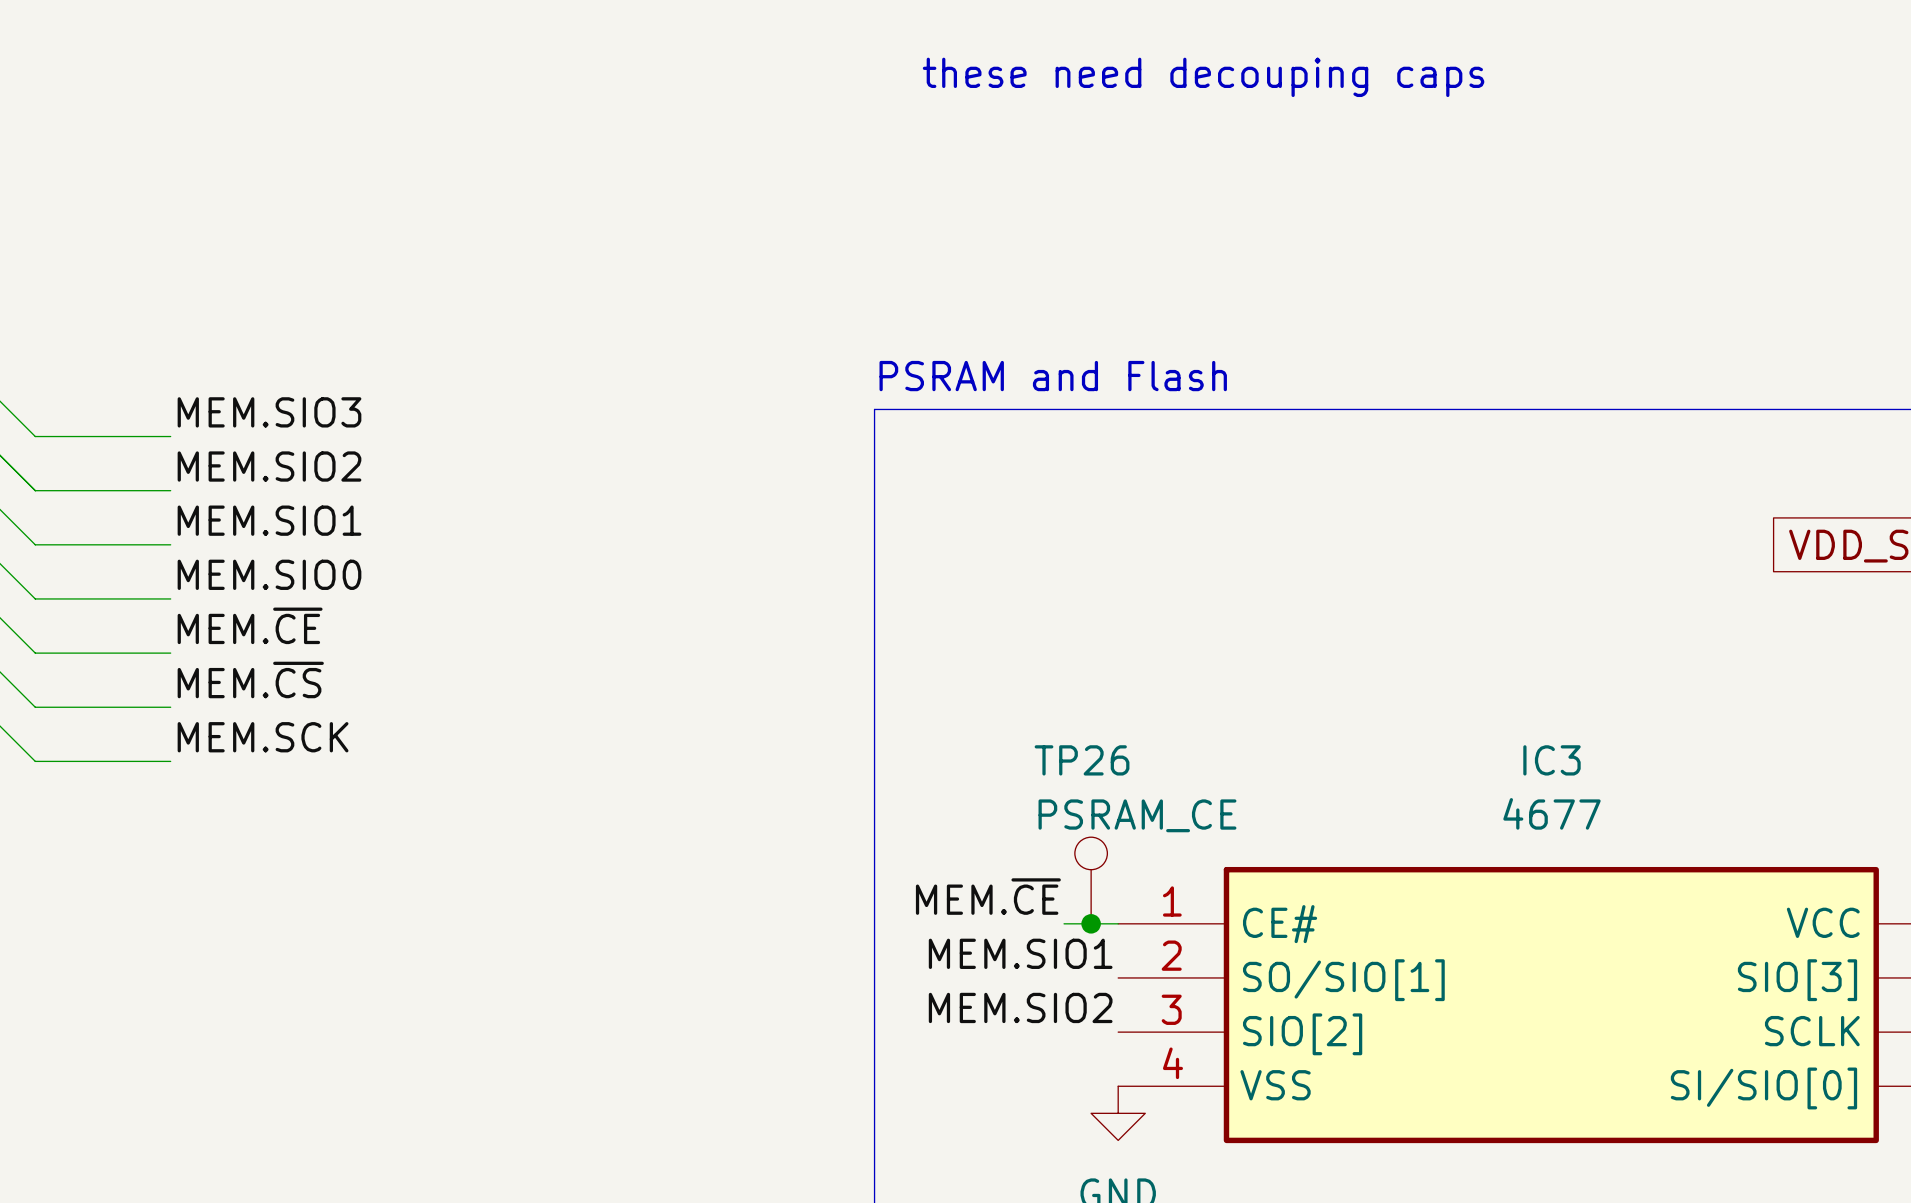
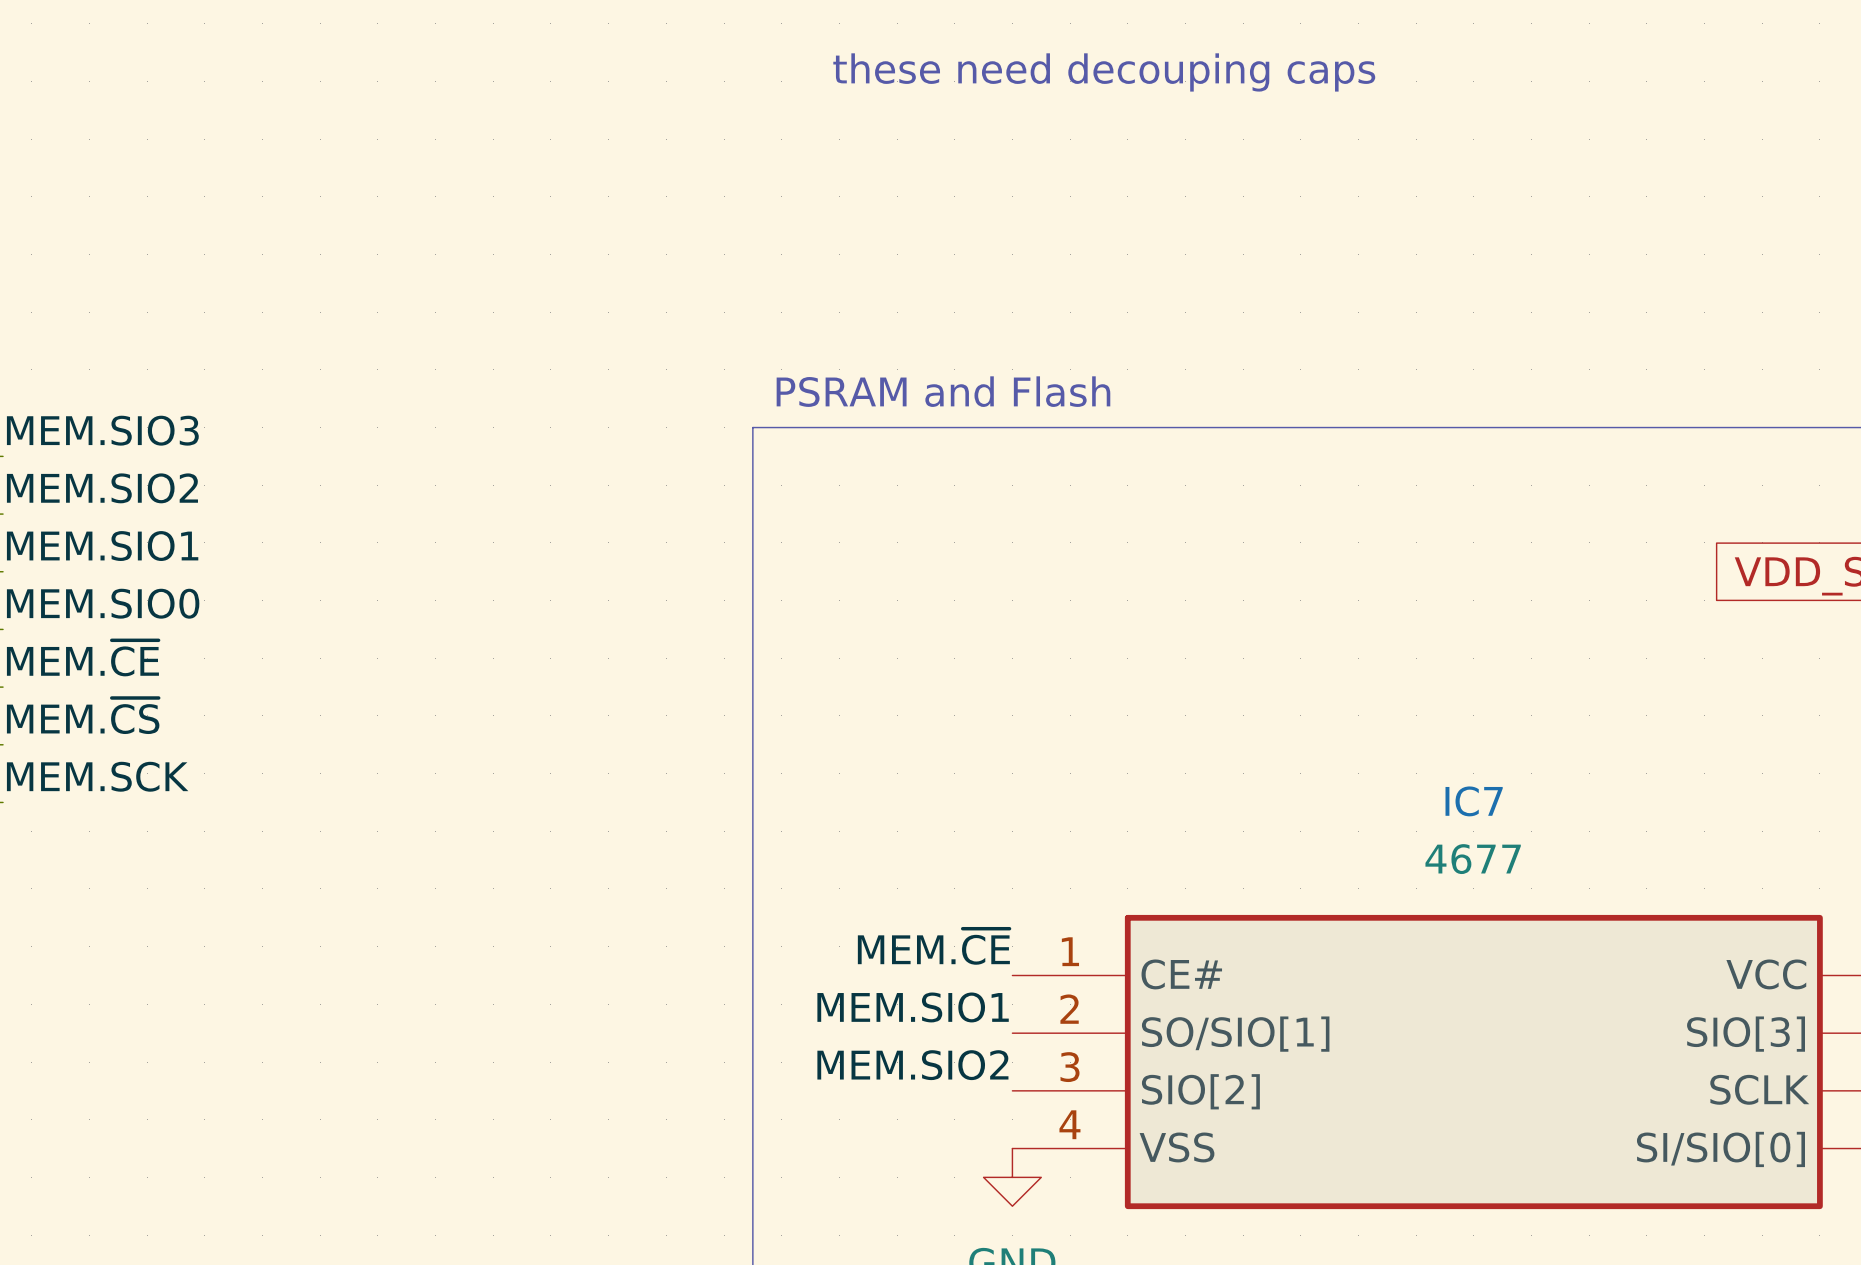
IC3 name: IC3 (1551, 760) -> IC7 (1474, 801)
TP26: PSRAM_CE (1091, 880) -> none
label position: MEM.~{CE} (988, 896) -> MEM.~{CE} (933, 946)
wire: (1064, 923) (1118, 923) -> none
junction: (1091, 923) -> none

